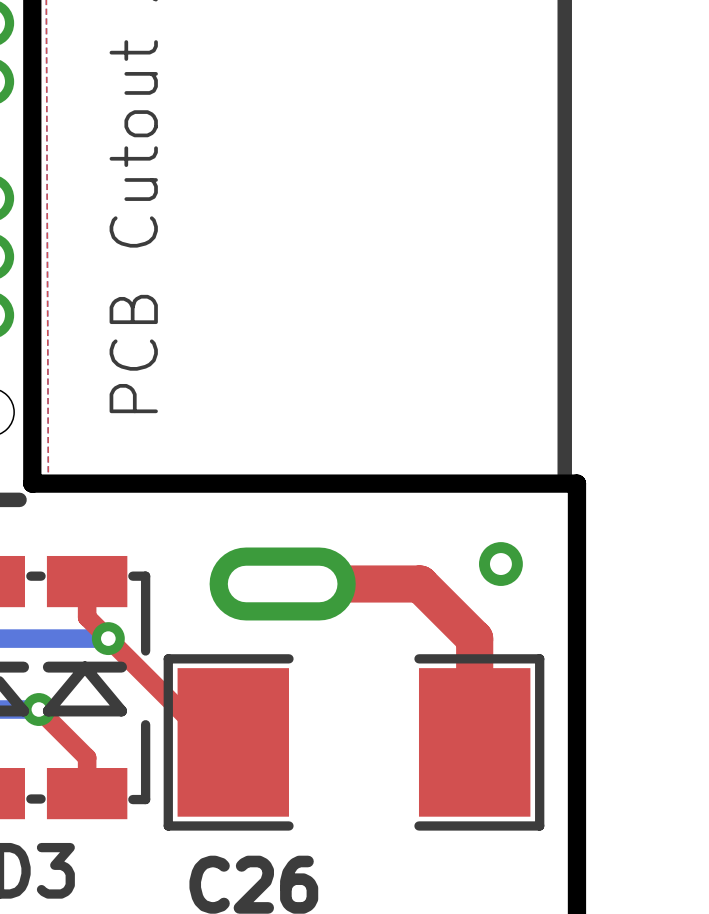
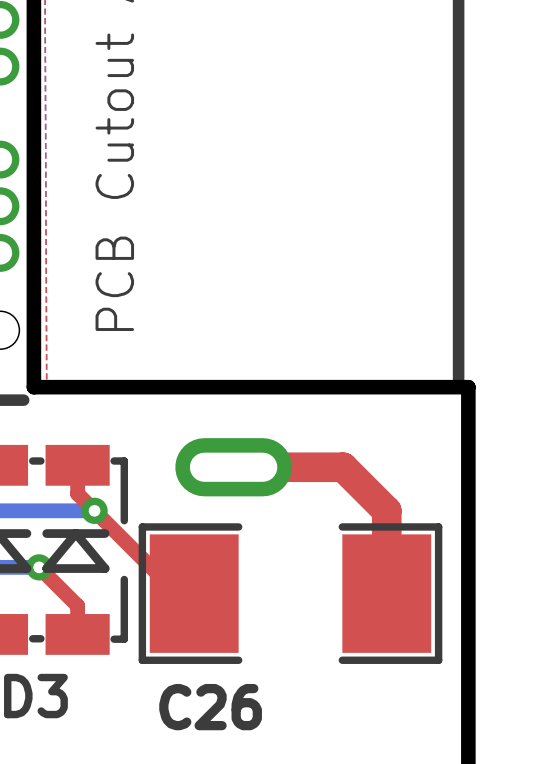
via: (500, 564) -> none

